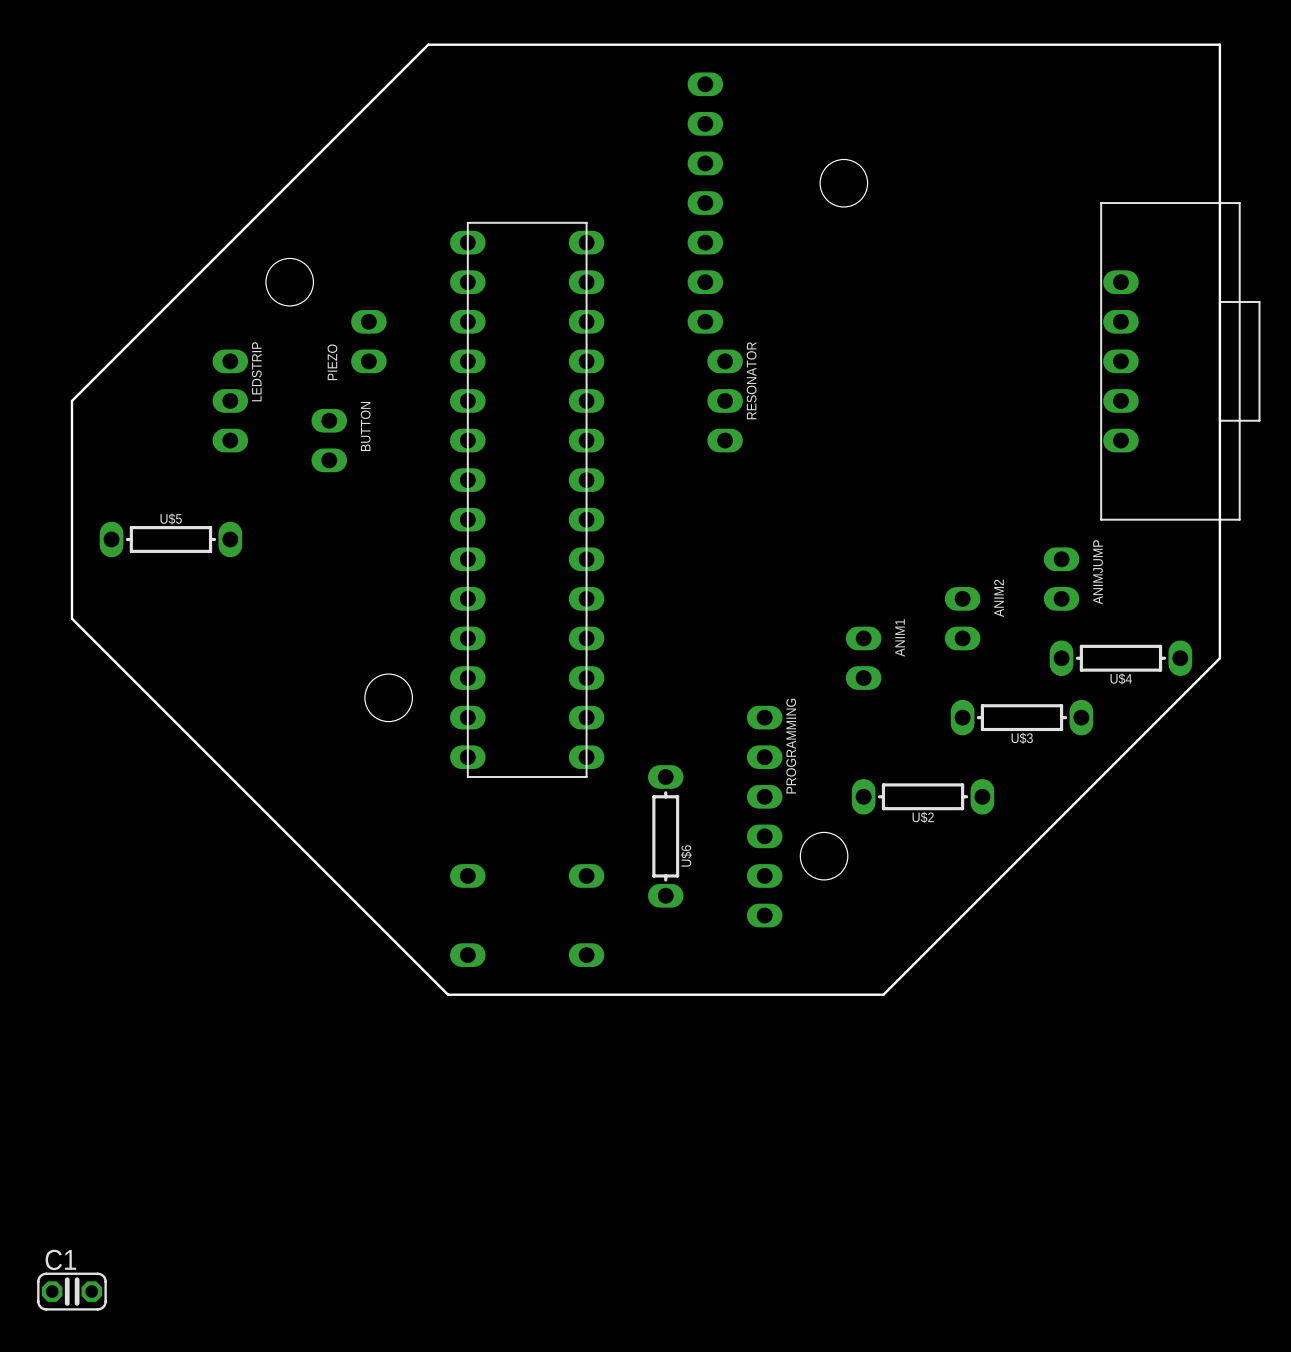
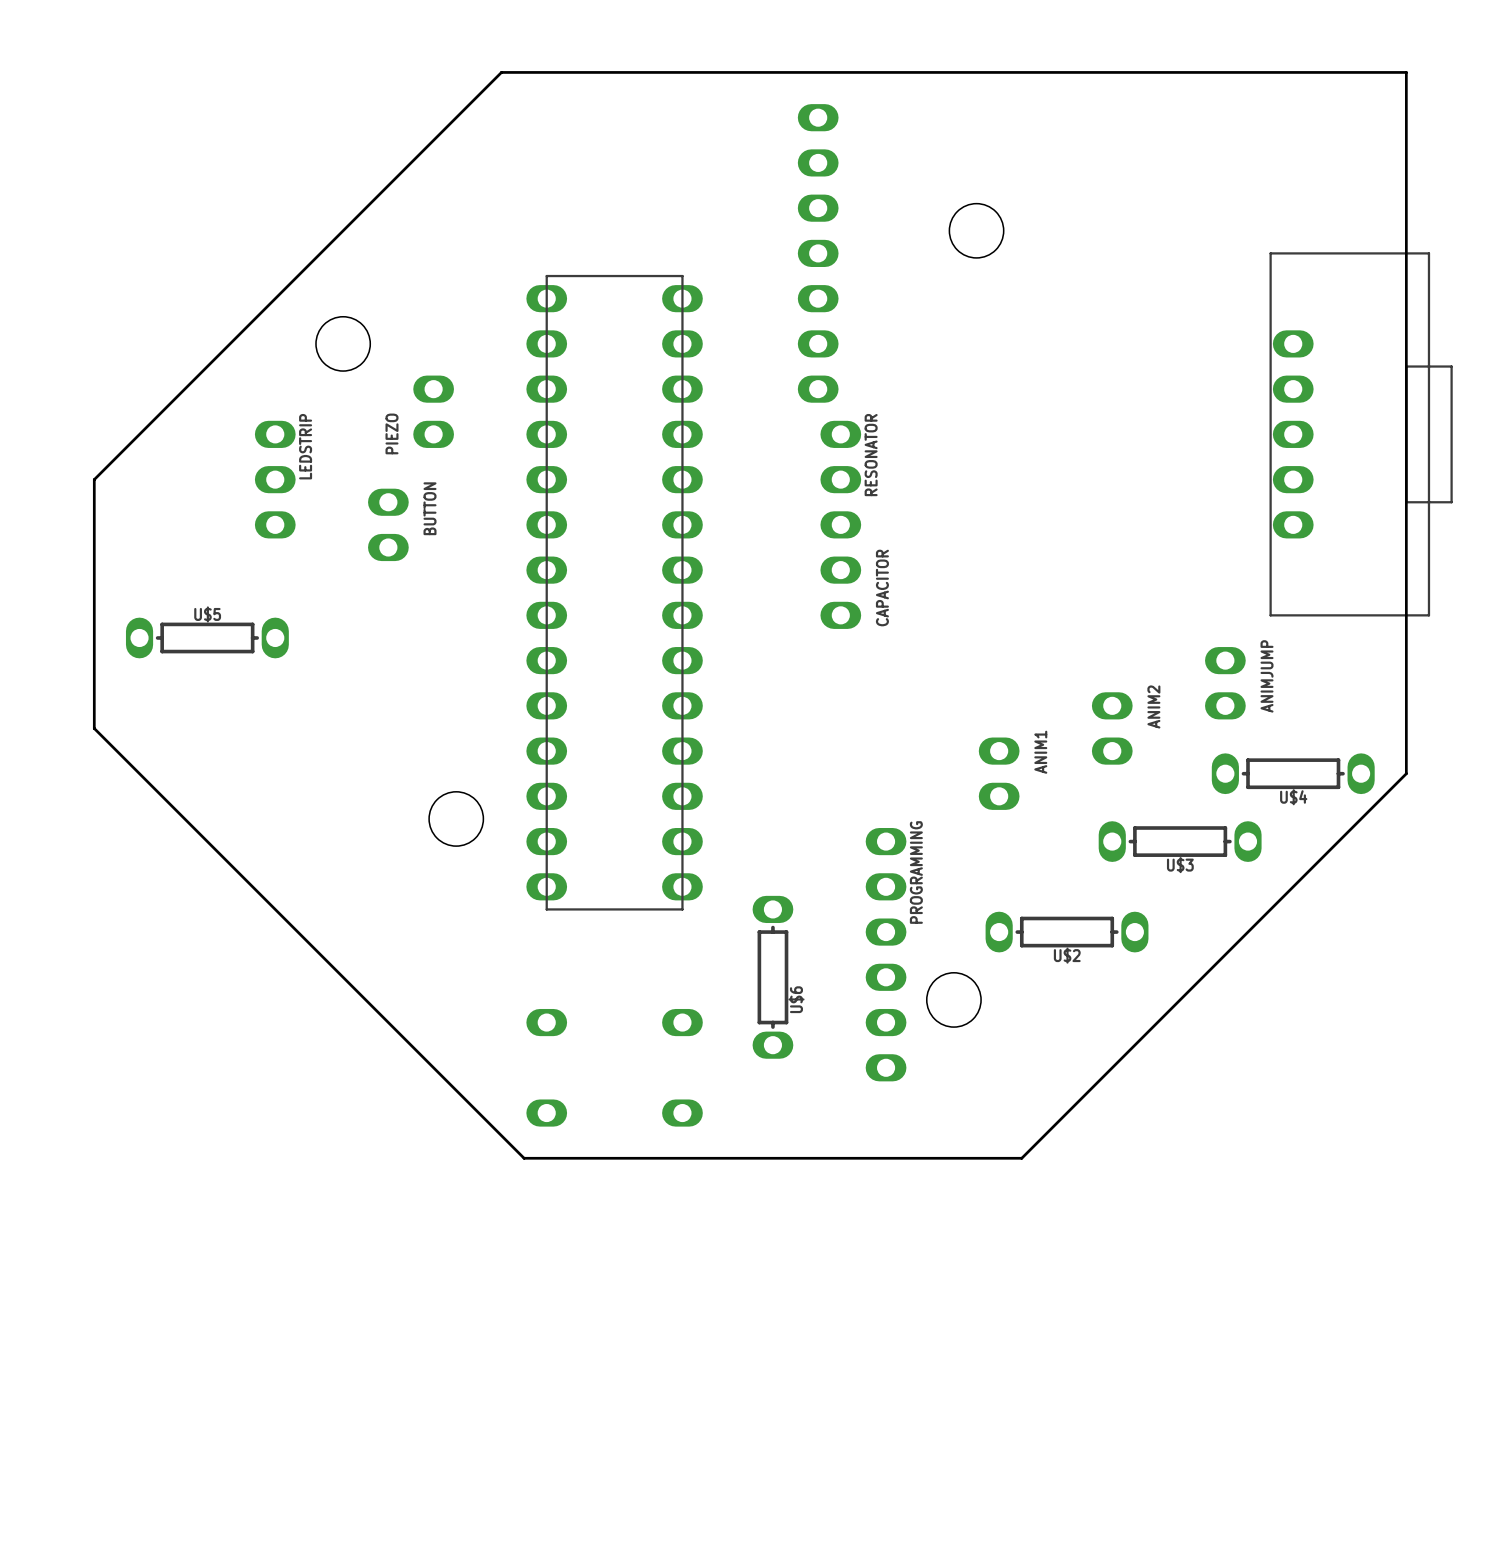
CAPACITOR: none -> (840, 592)
C1: (71, 1291) -> none

